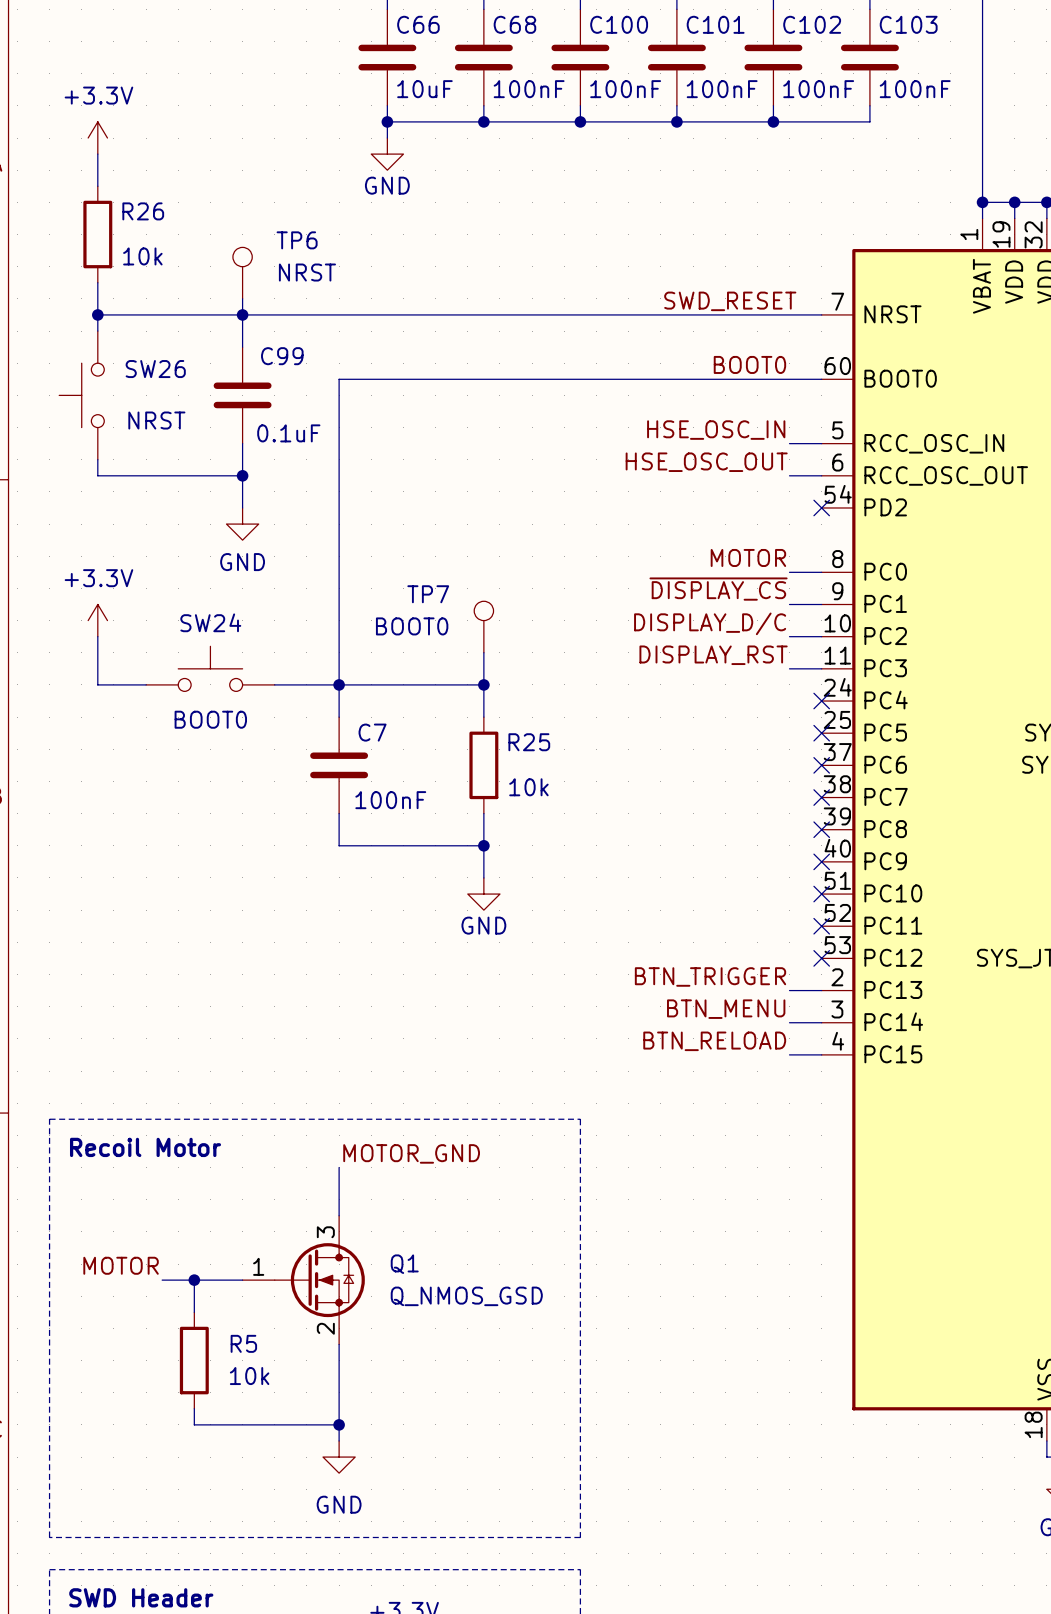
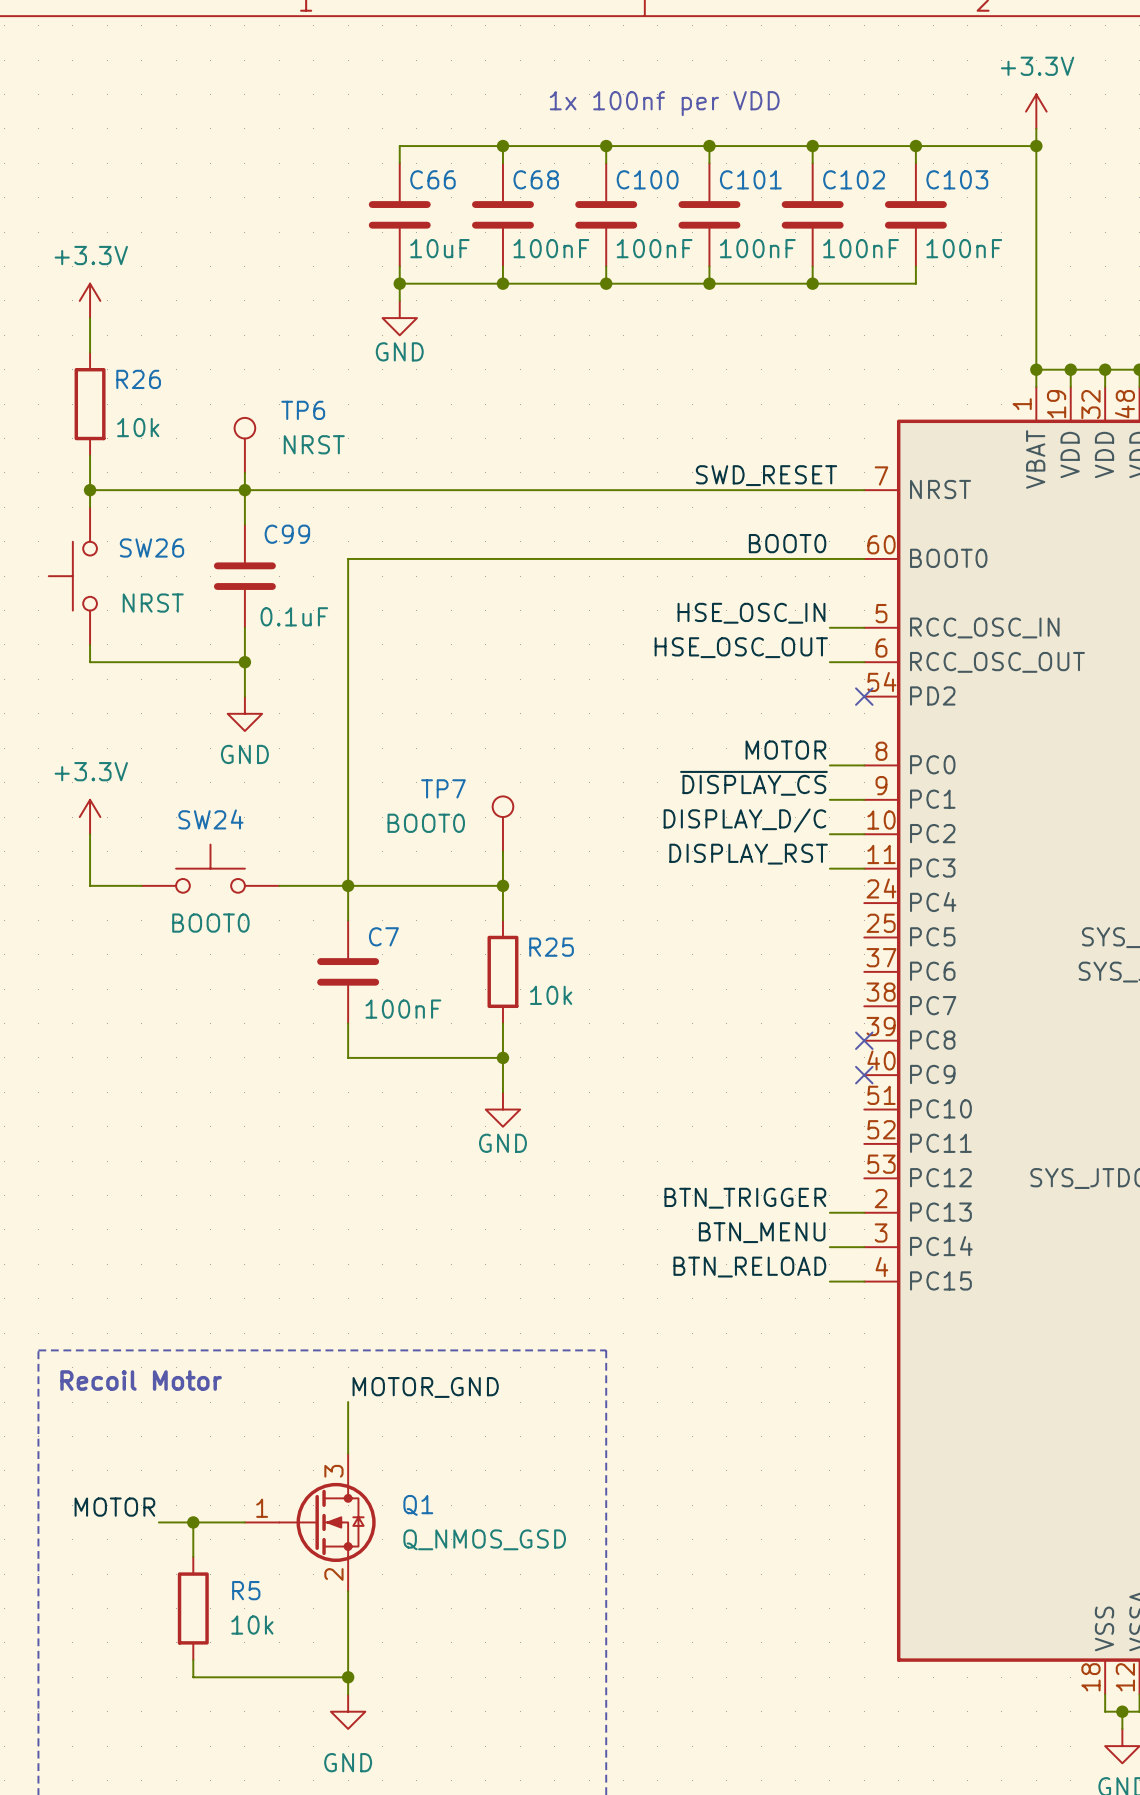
no-connect mark: (821, 701) -> none
no-connect mark: (821, 733) -> none
no-connect mark: (821, 765) -> none
no-connect mark: (821, 797) -> none
no-connect mark: (821, 894) -> none
no-connect mark: (821, 926) -> none
no-connect mark: (821, 958) -> none

